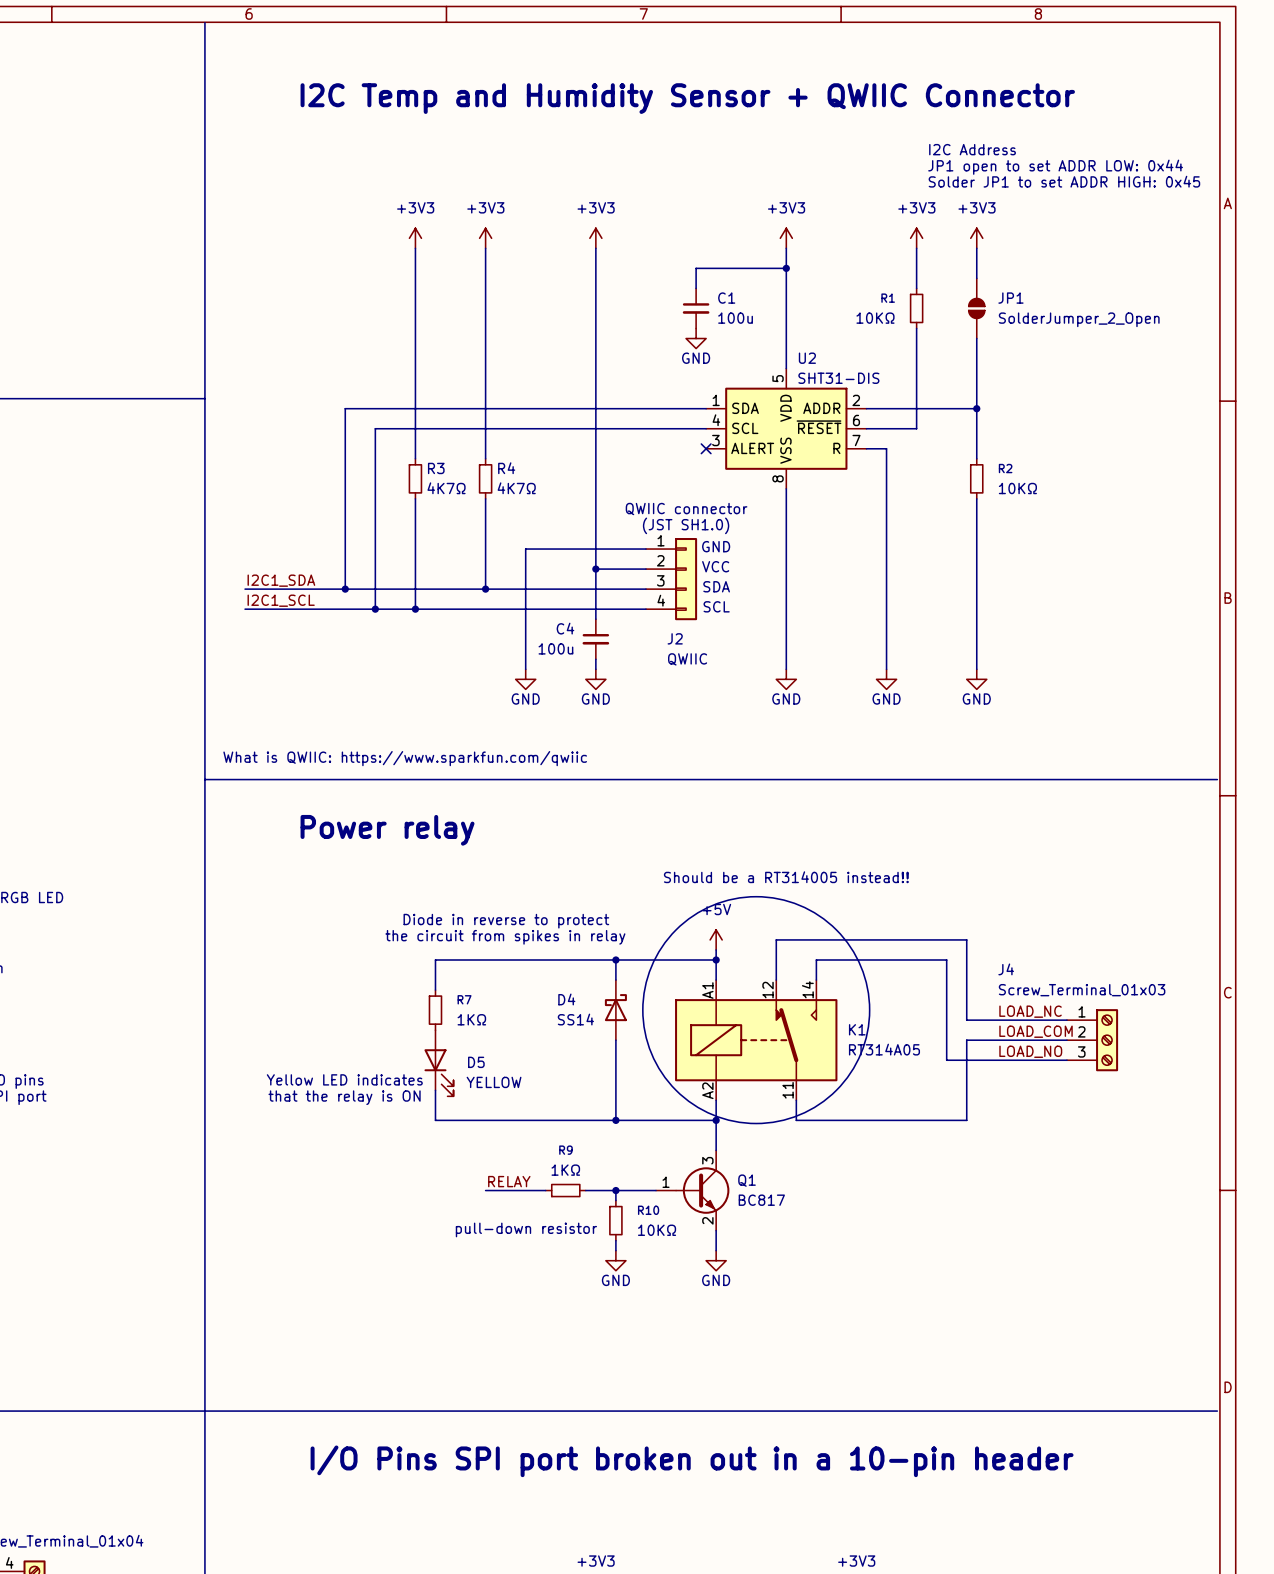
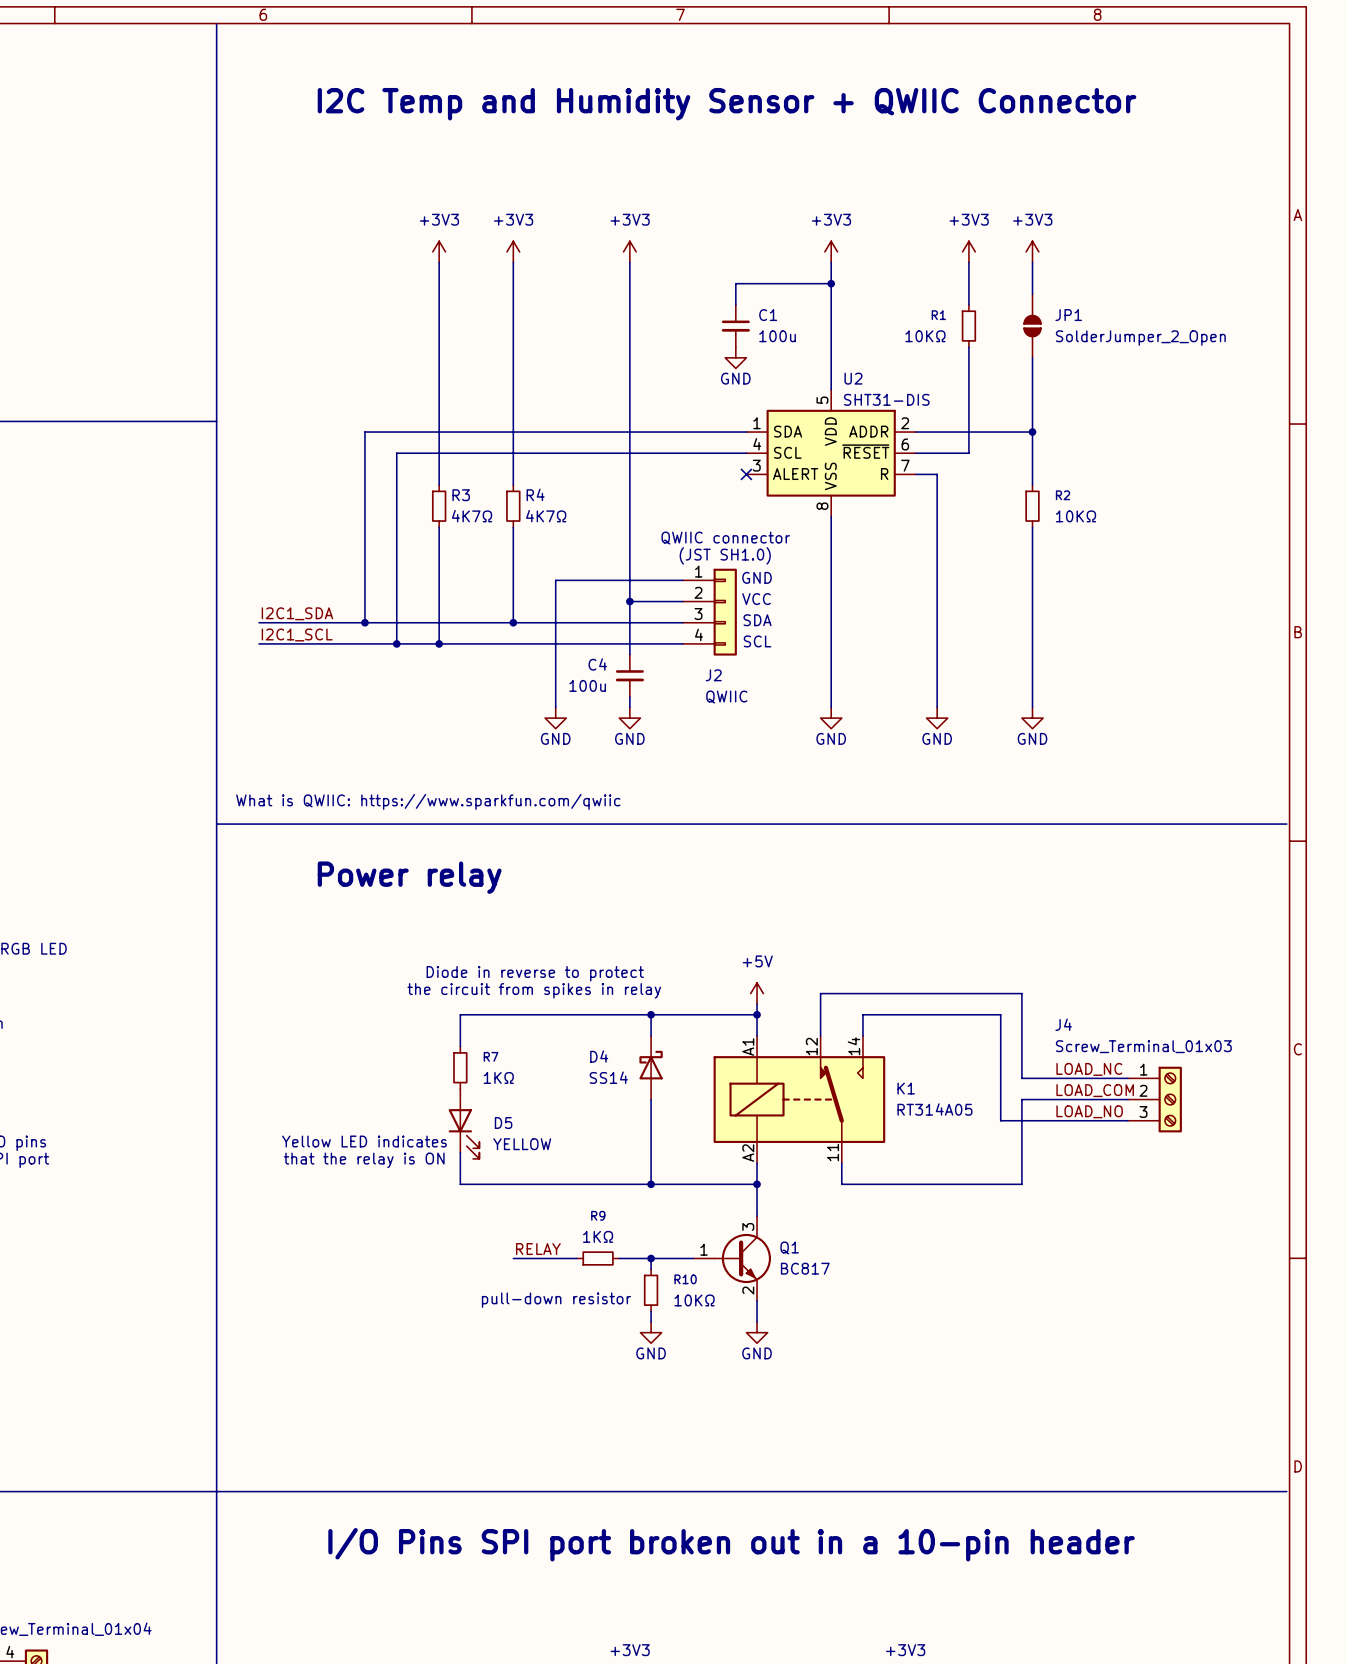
text: I2C Address (972, 149) -> none
text: JP1 open to set ADDR LOW: 0x44 (1055, 167) -> none
text: Solder JP1 to set ADDR HIGH: 0x45 (1064, 181) -> none
text: Should be a RT314005 instead!! (786, 877) -> none
drawing: [642, 896, 870, 1124] -> none

